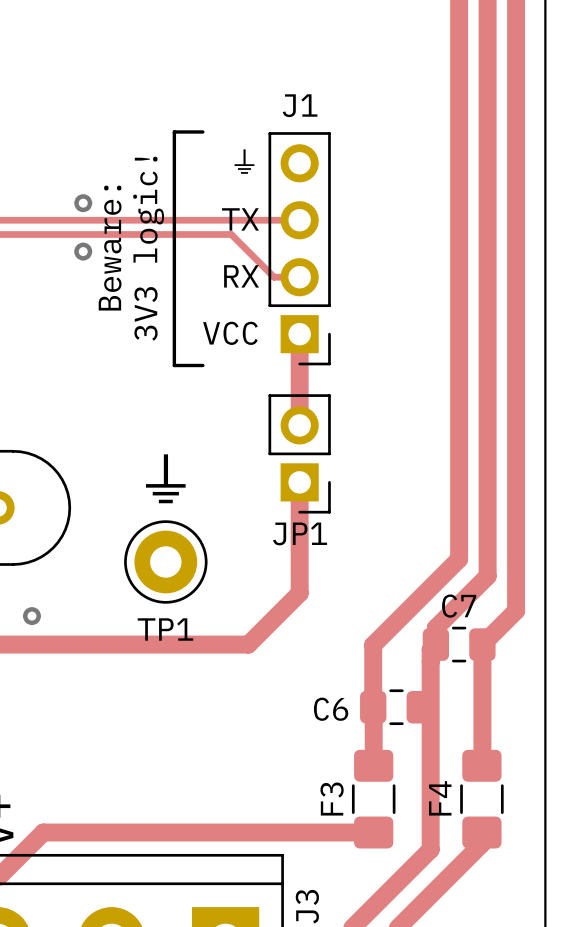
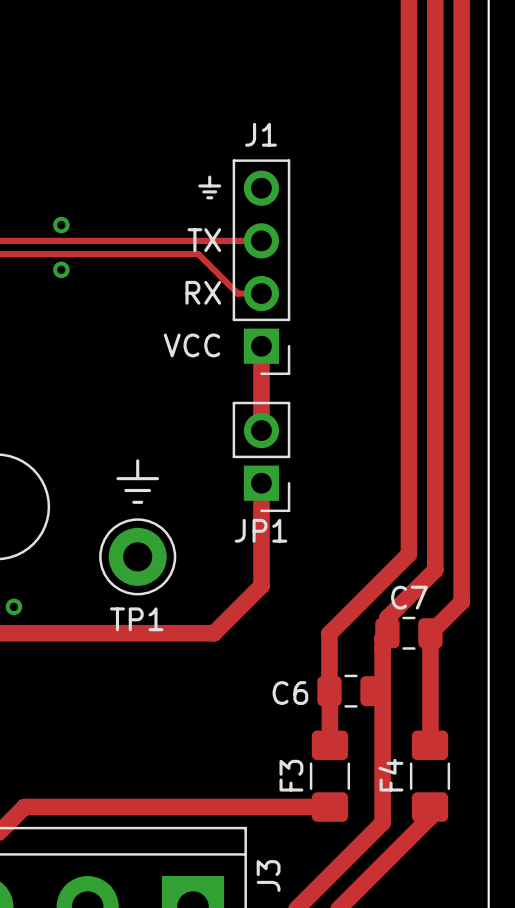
line: (202, 131) (174, 131) (174, 365) (202, 365) -> none
text: Beware: (110, 248) -> none
text: 3V3 logic! (148, 248) -> none

